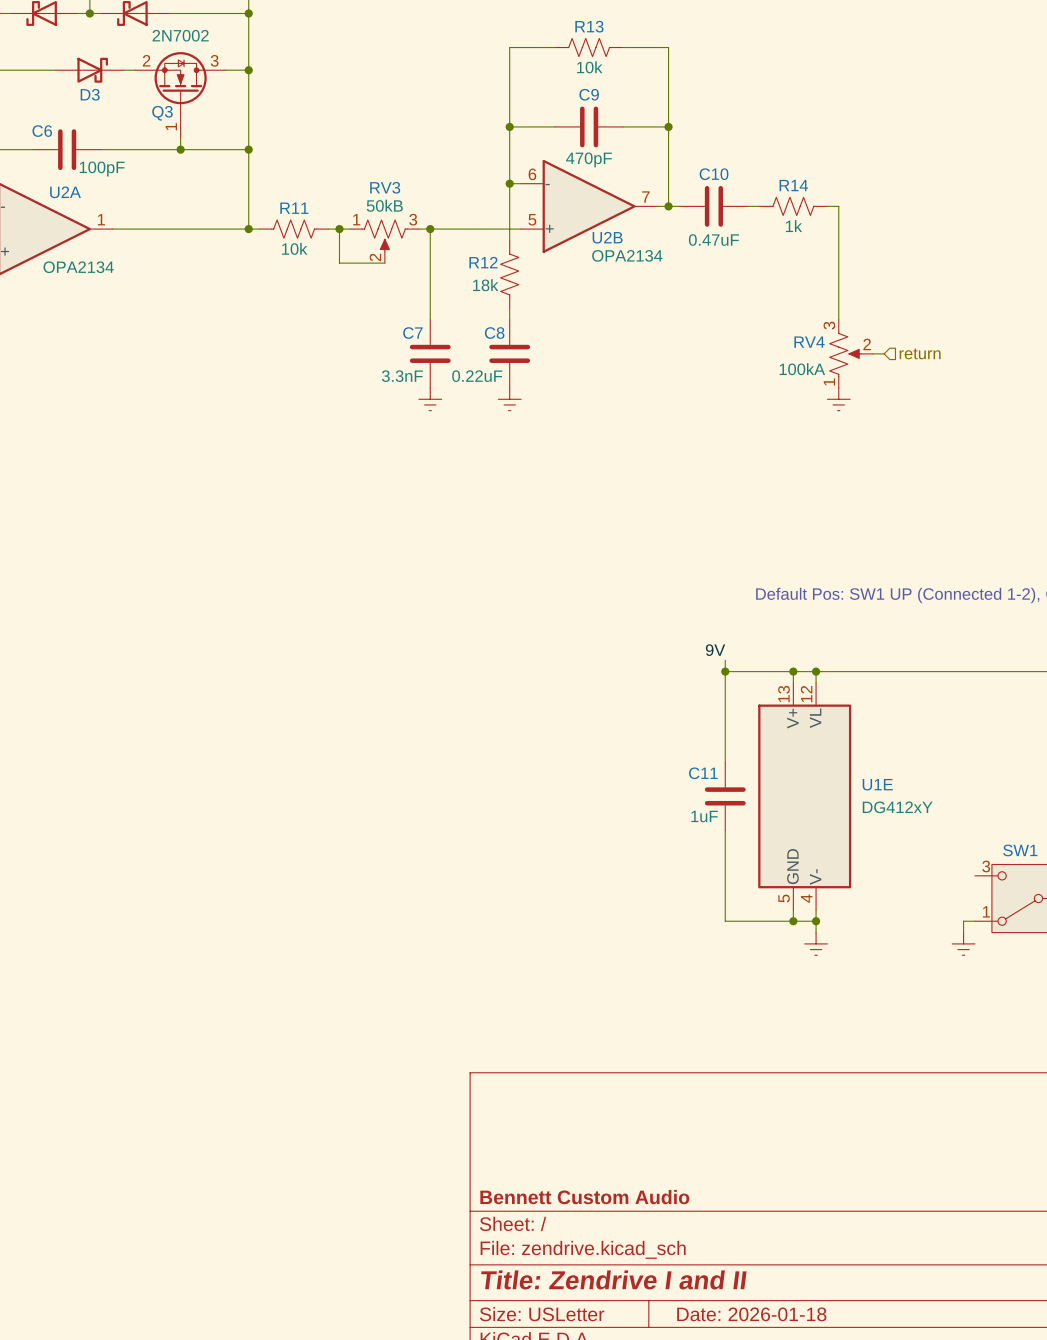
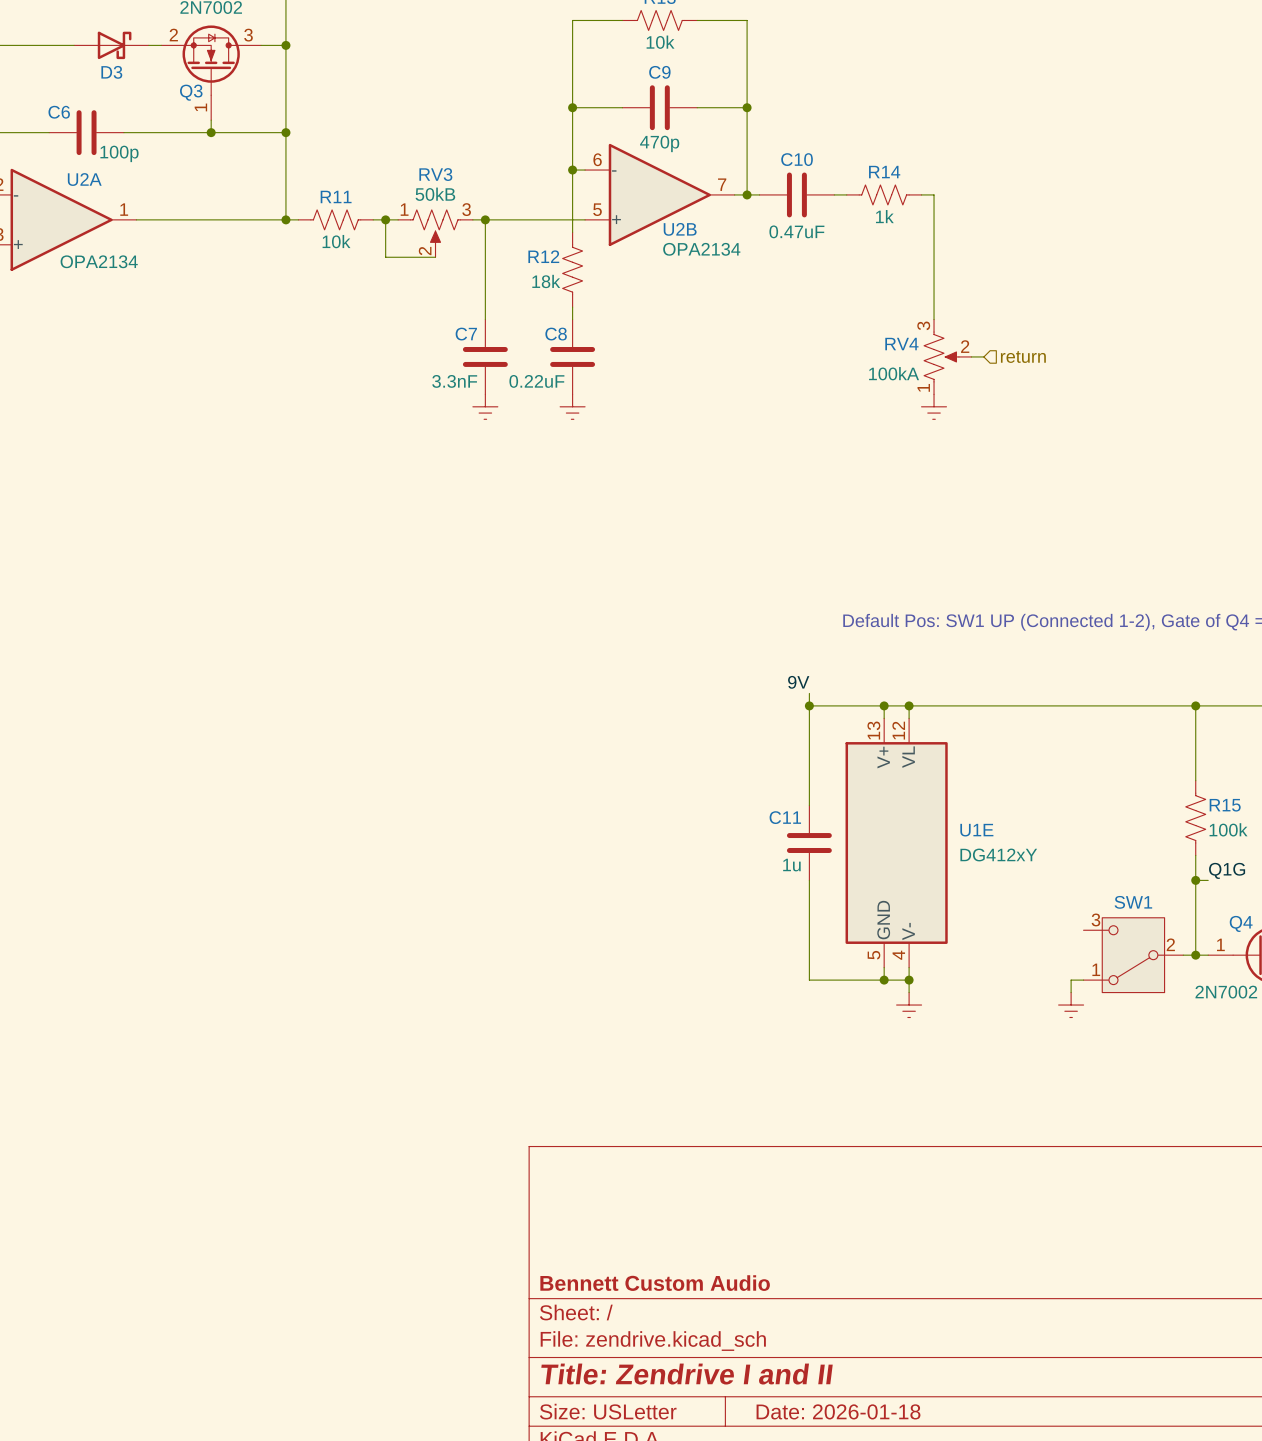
C9 value: 470pF (588, 159) -> 470p (659, 143)
C6 value: 100pF (102, 169) -> 100p (119, 153)
C11 value: 1uF (704, 816) -> 1u (791, 865)

